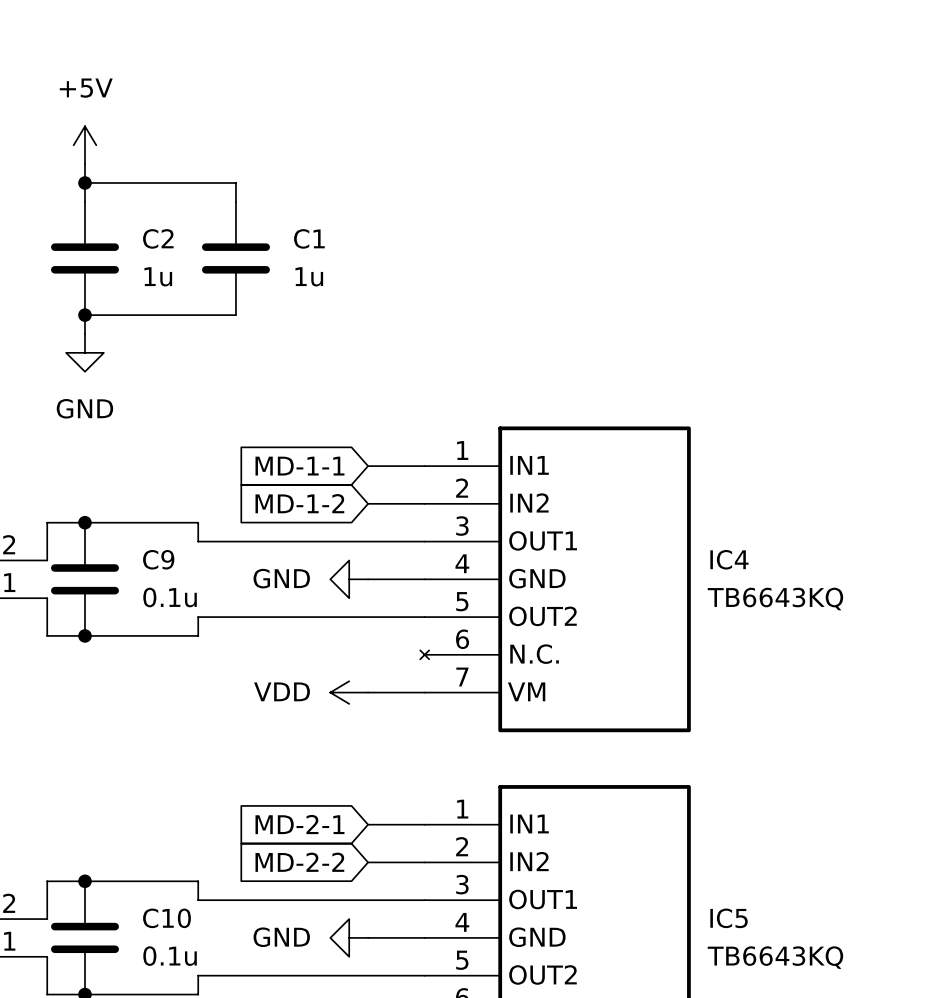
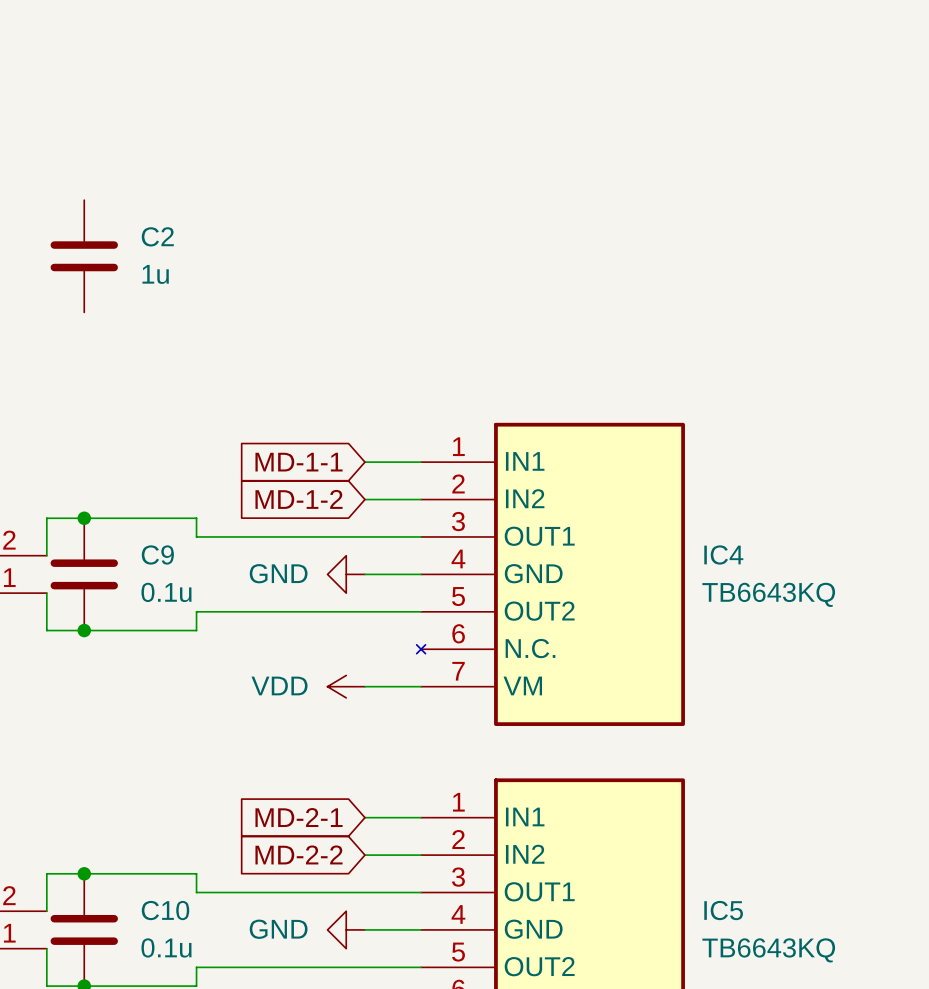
power symbol: +5V (84, 145) -> none
wire: (84, 164) (84, 201) -> none
wire: (84, 182) (235, 182) (235, 201) -> none
junction: (84, 182) -> none
C1: 1u (235, 258) -> none
junction: (84, 315) -> none
wire: (235, 315) (84, 315) (84, 333) -> none
power symbol: GND (84, 352) -> none

